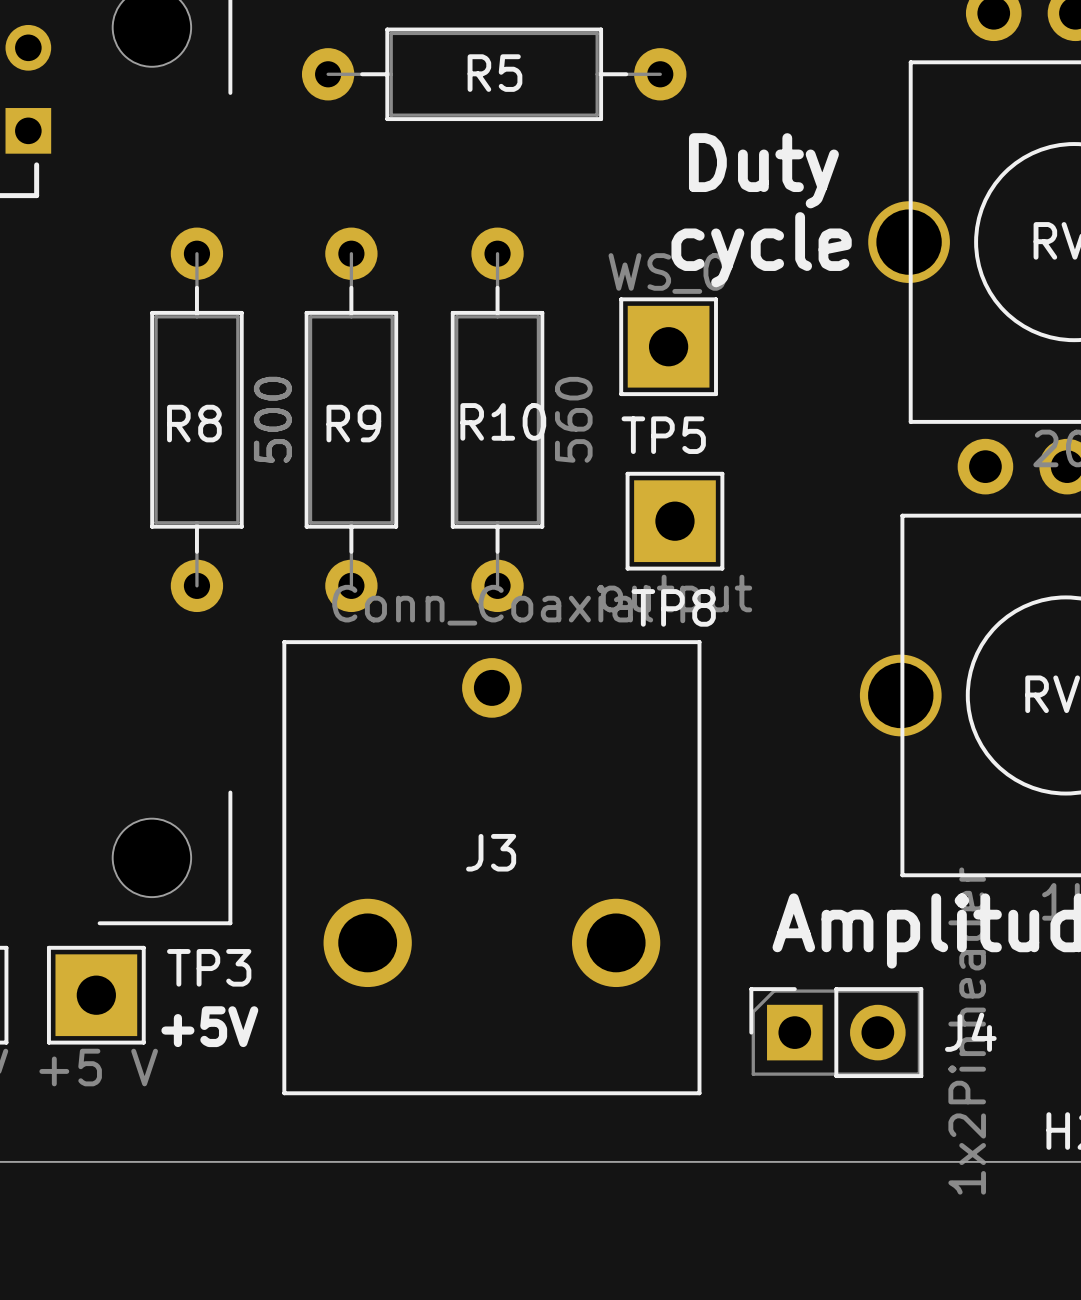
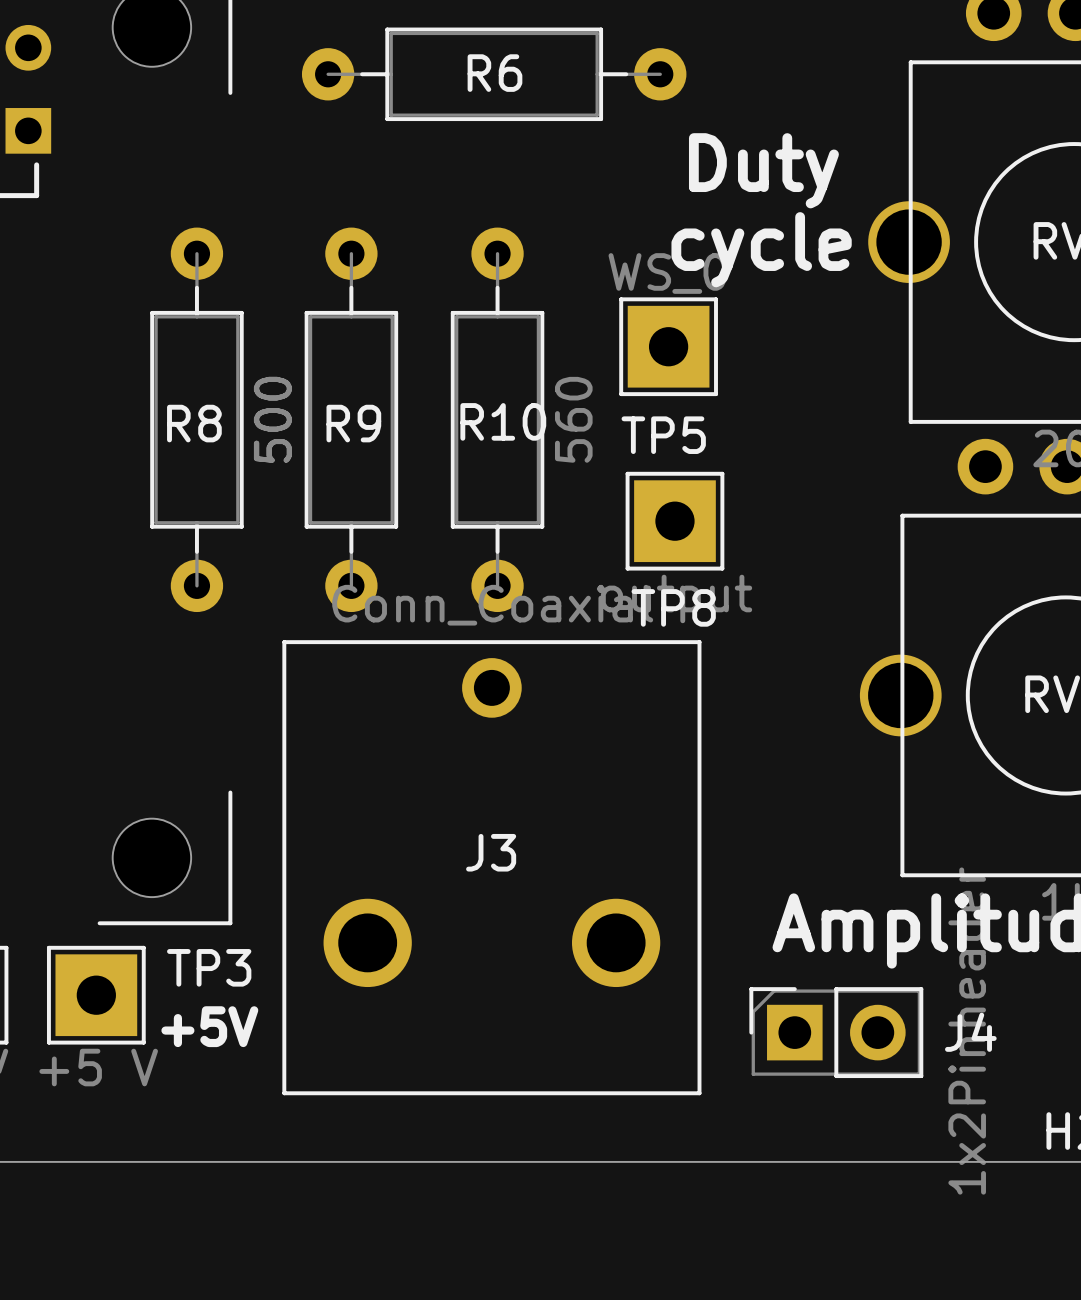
R5 name: R5 (494, 73) -> R6 (494, 73)

